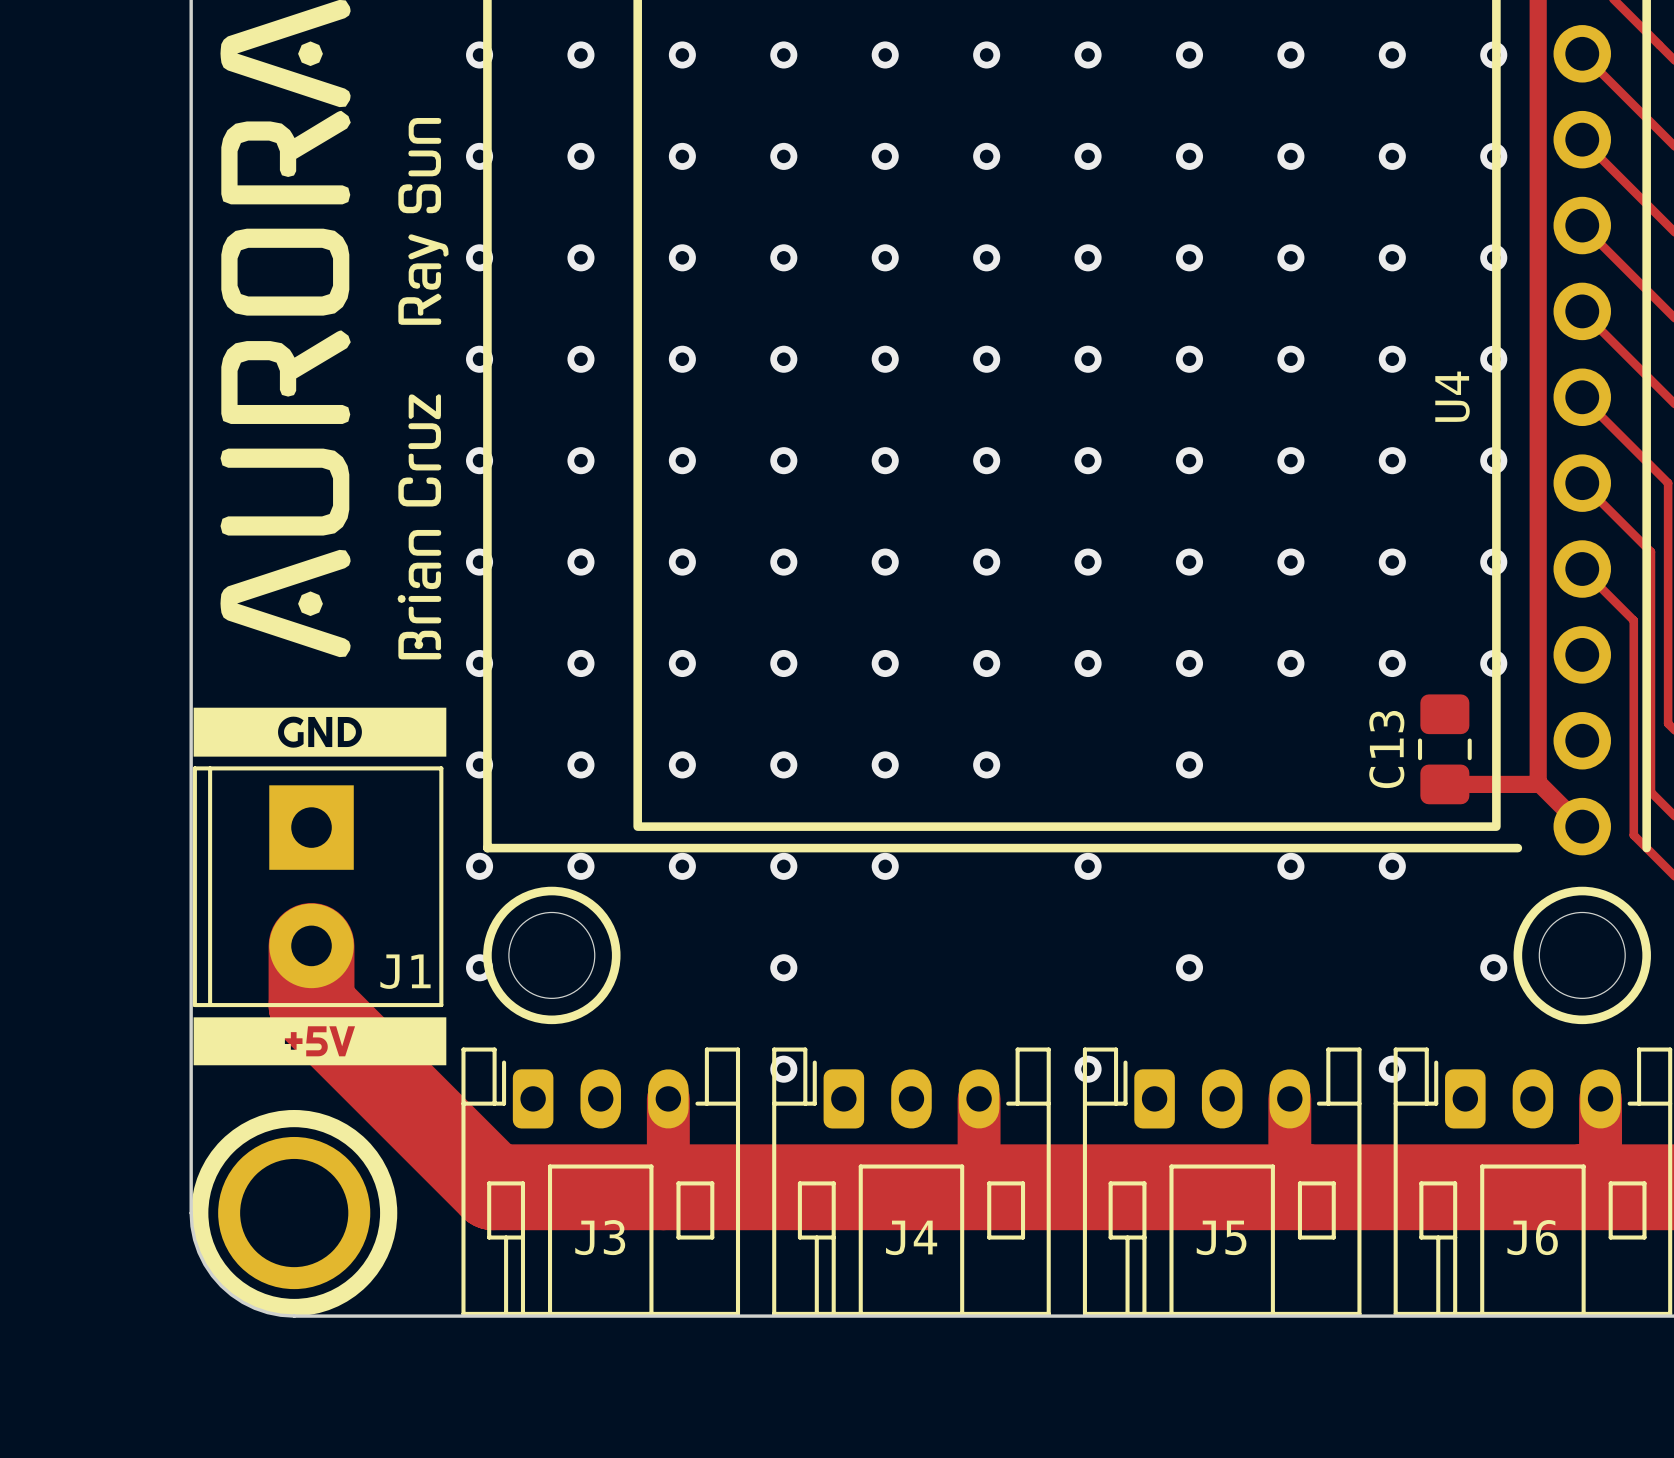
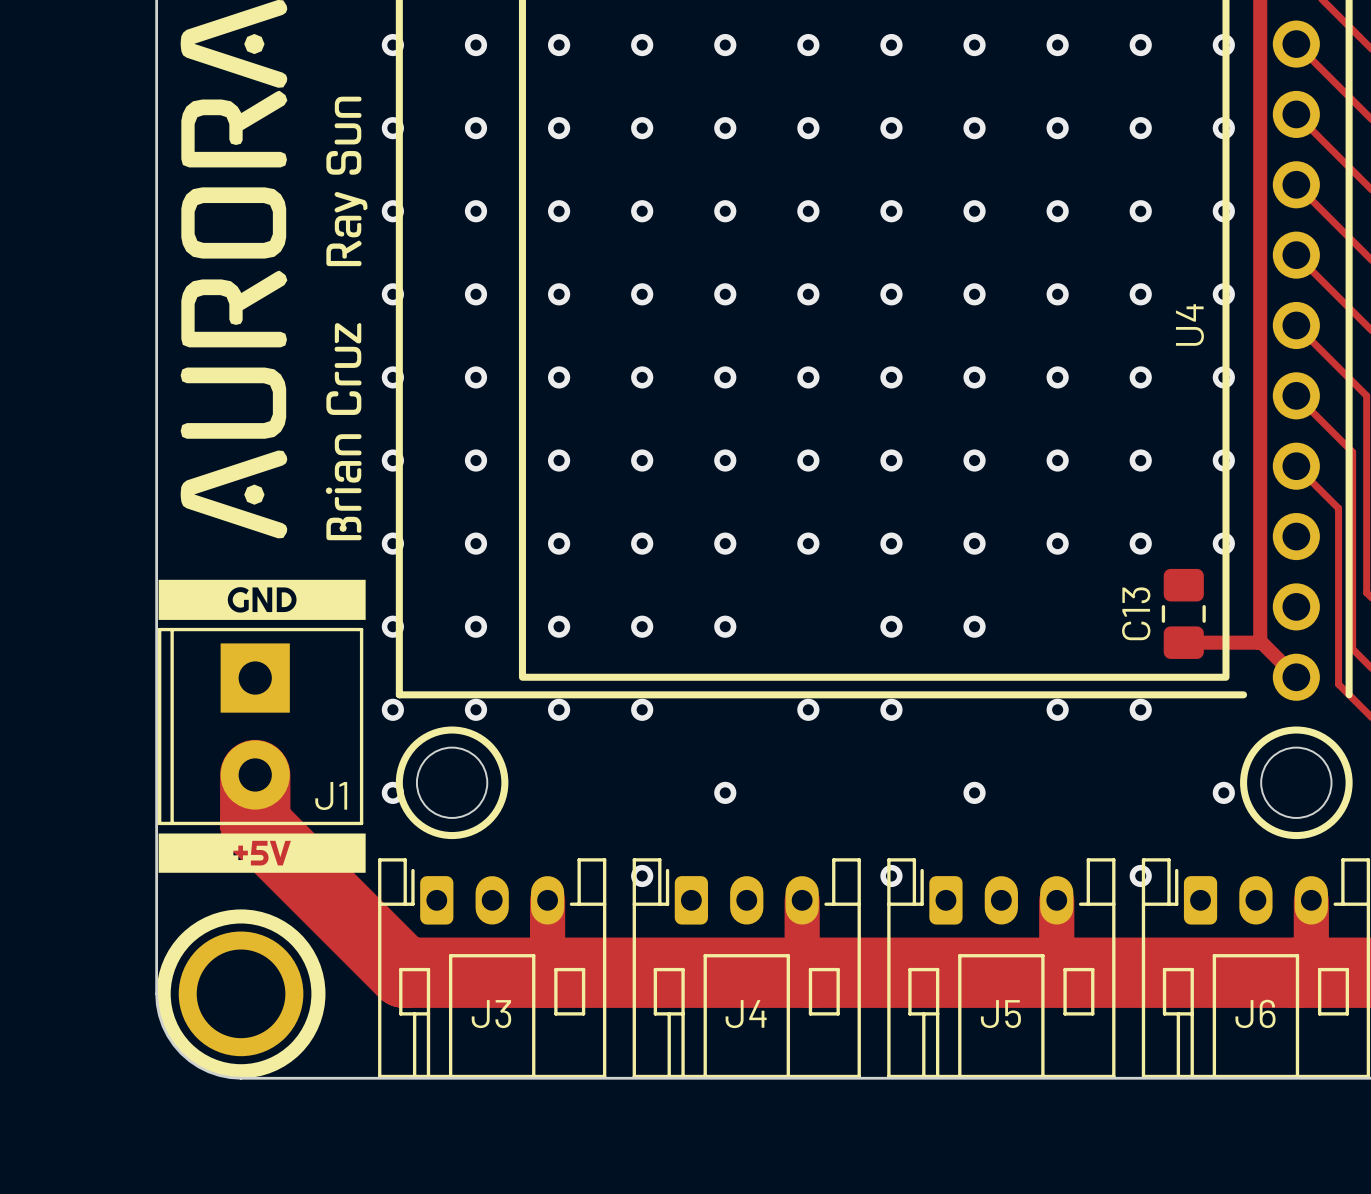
via: (986, 764) -> none
via: none -> (891, 626)
via: (885, 866) -> none
via: none -> (808, 709)
via: (783, 967) -> none
via: none -> (725, 792)

